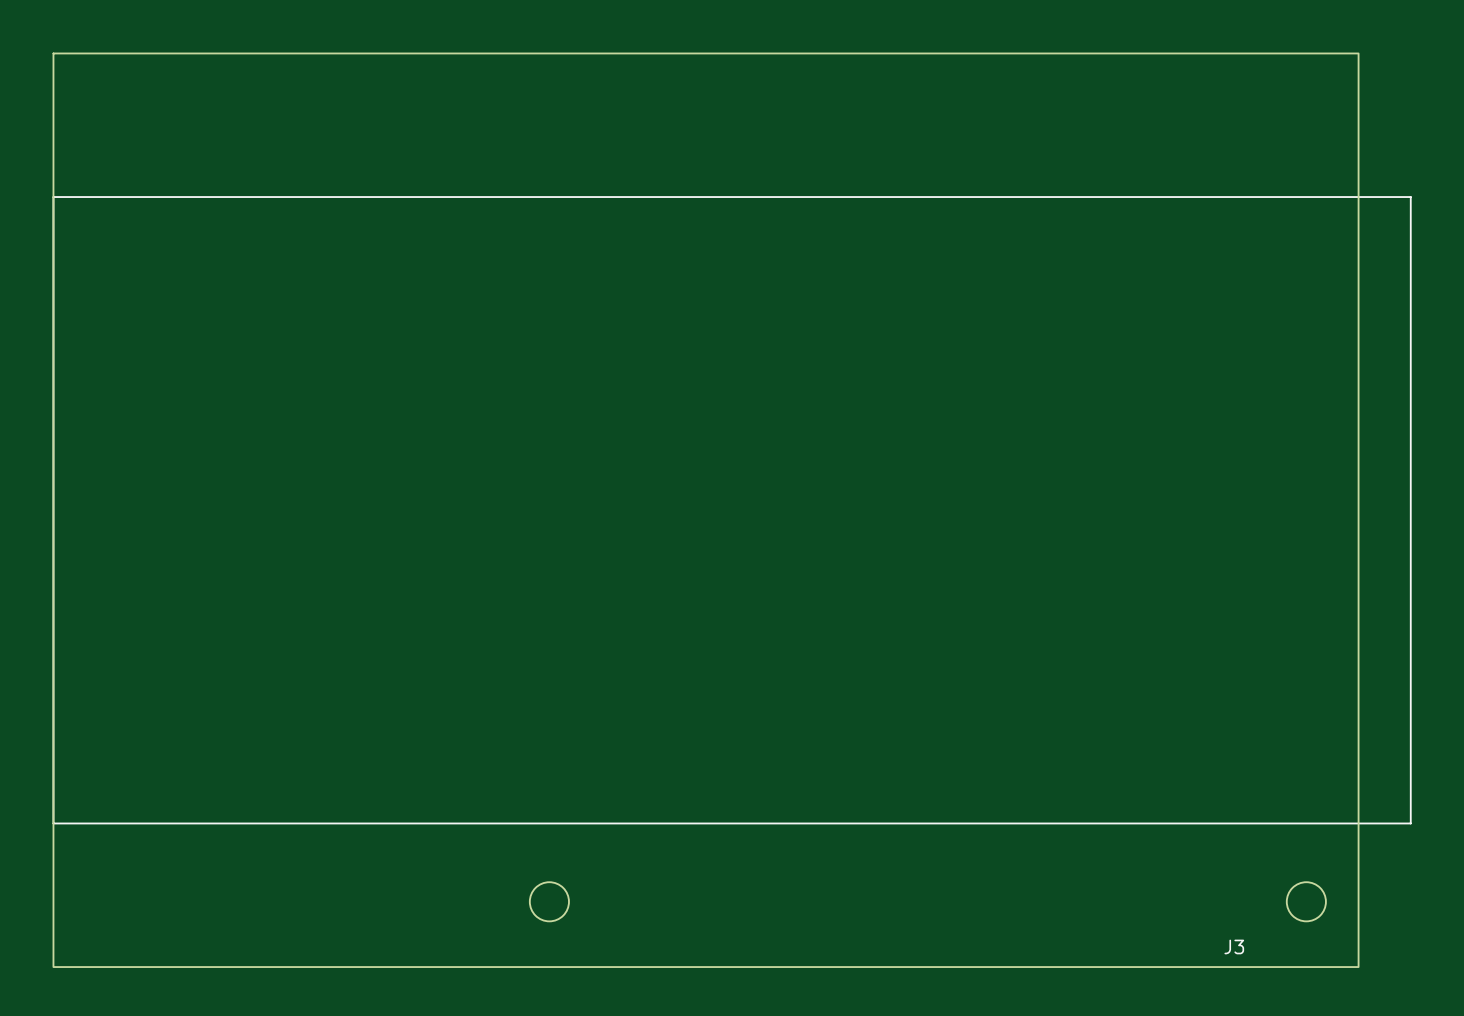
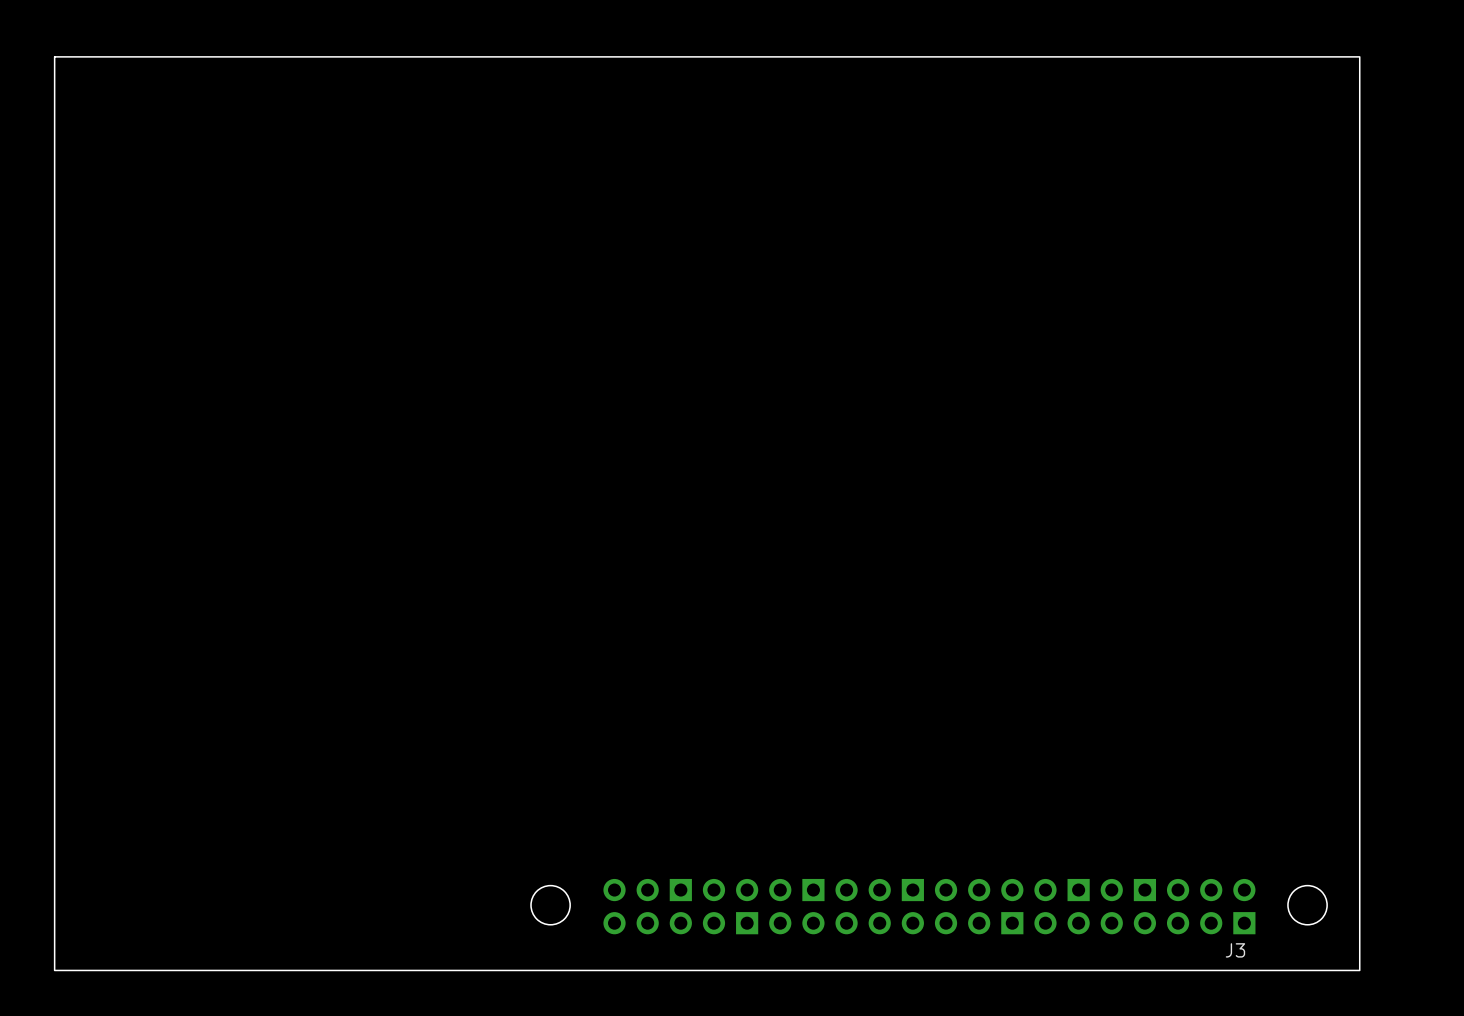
J3 footprint: [53, 53, 1359, 968] -> [54, 56, 1361, 971]
line: (53, 197) (1410, 197) (1410, 823) (53, 823) (53, 197) -> none

